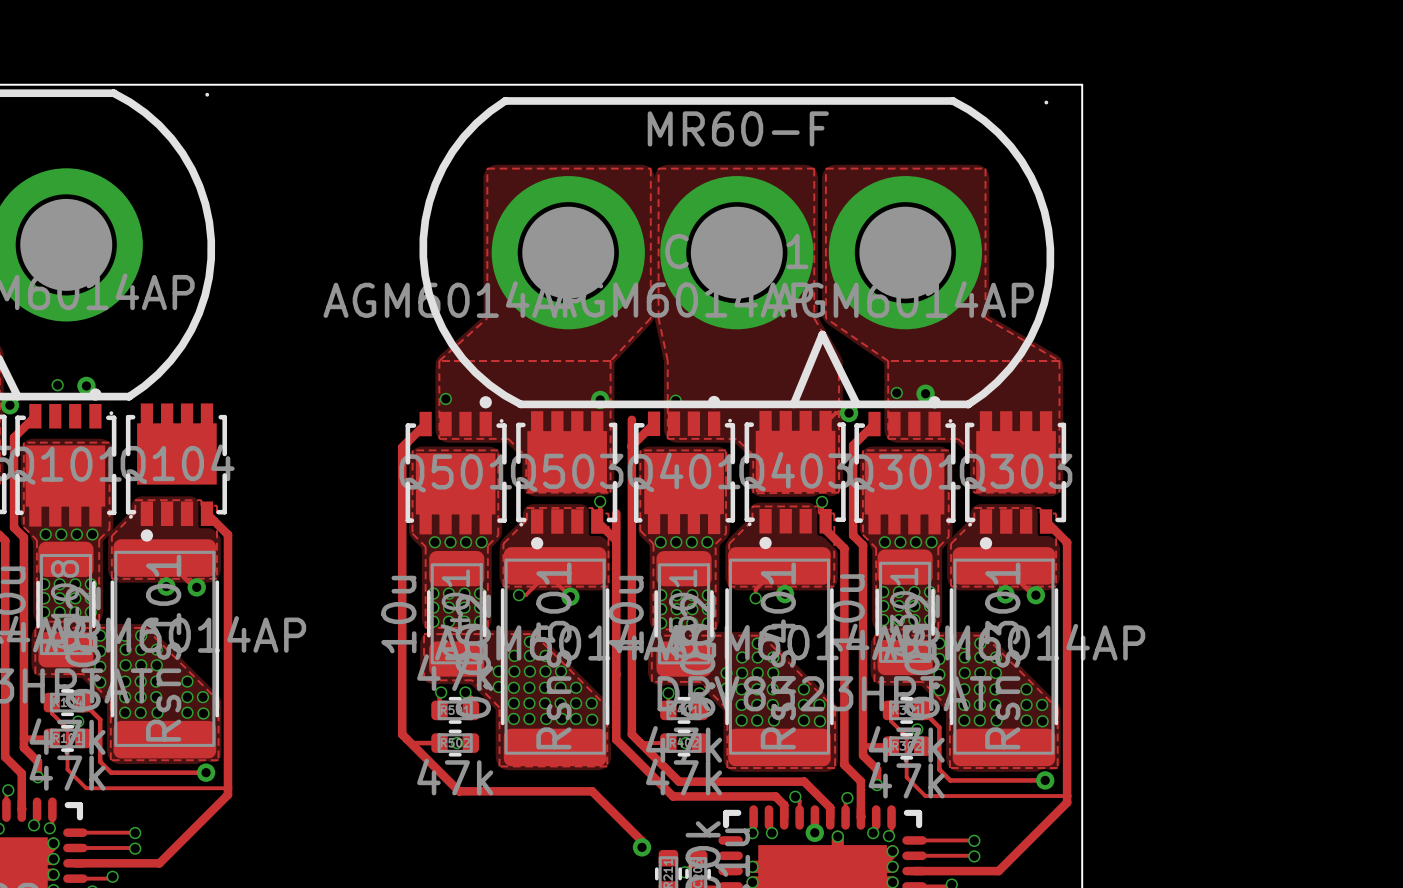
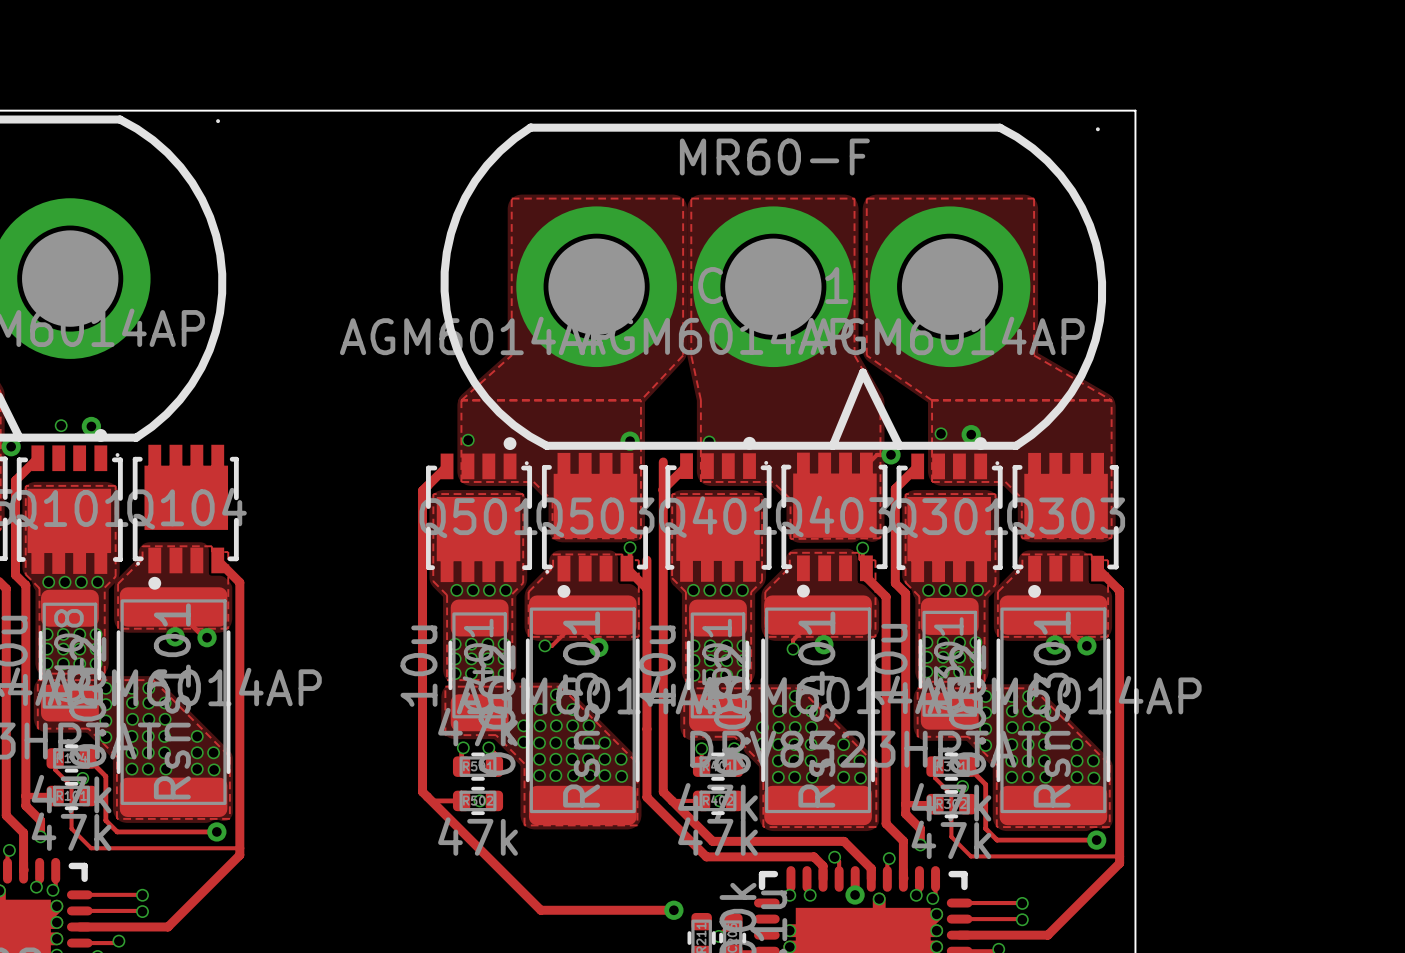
track: (459, 791) (592, 791) (642, 841) (642, 847) -> (482, 851) (540, 910) (673, 910)

